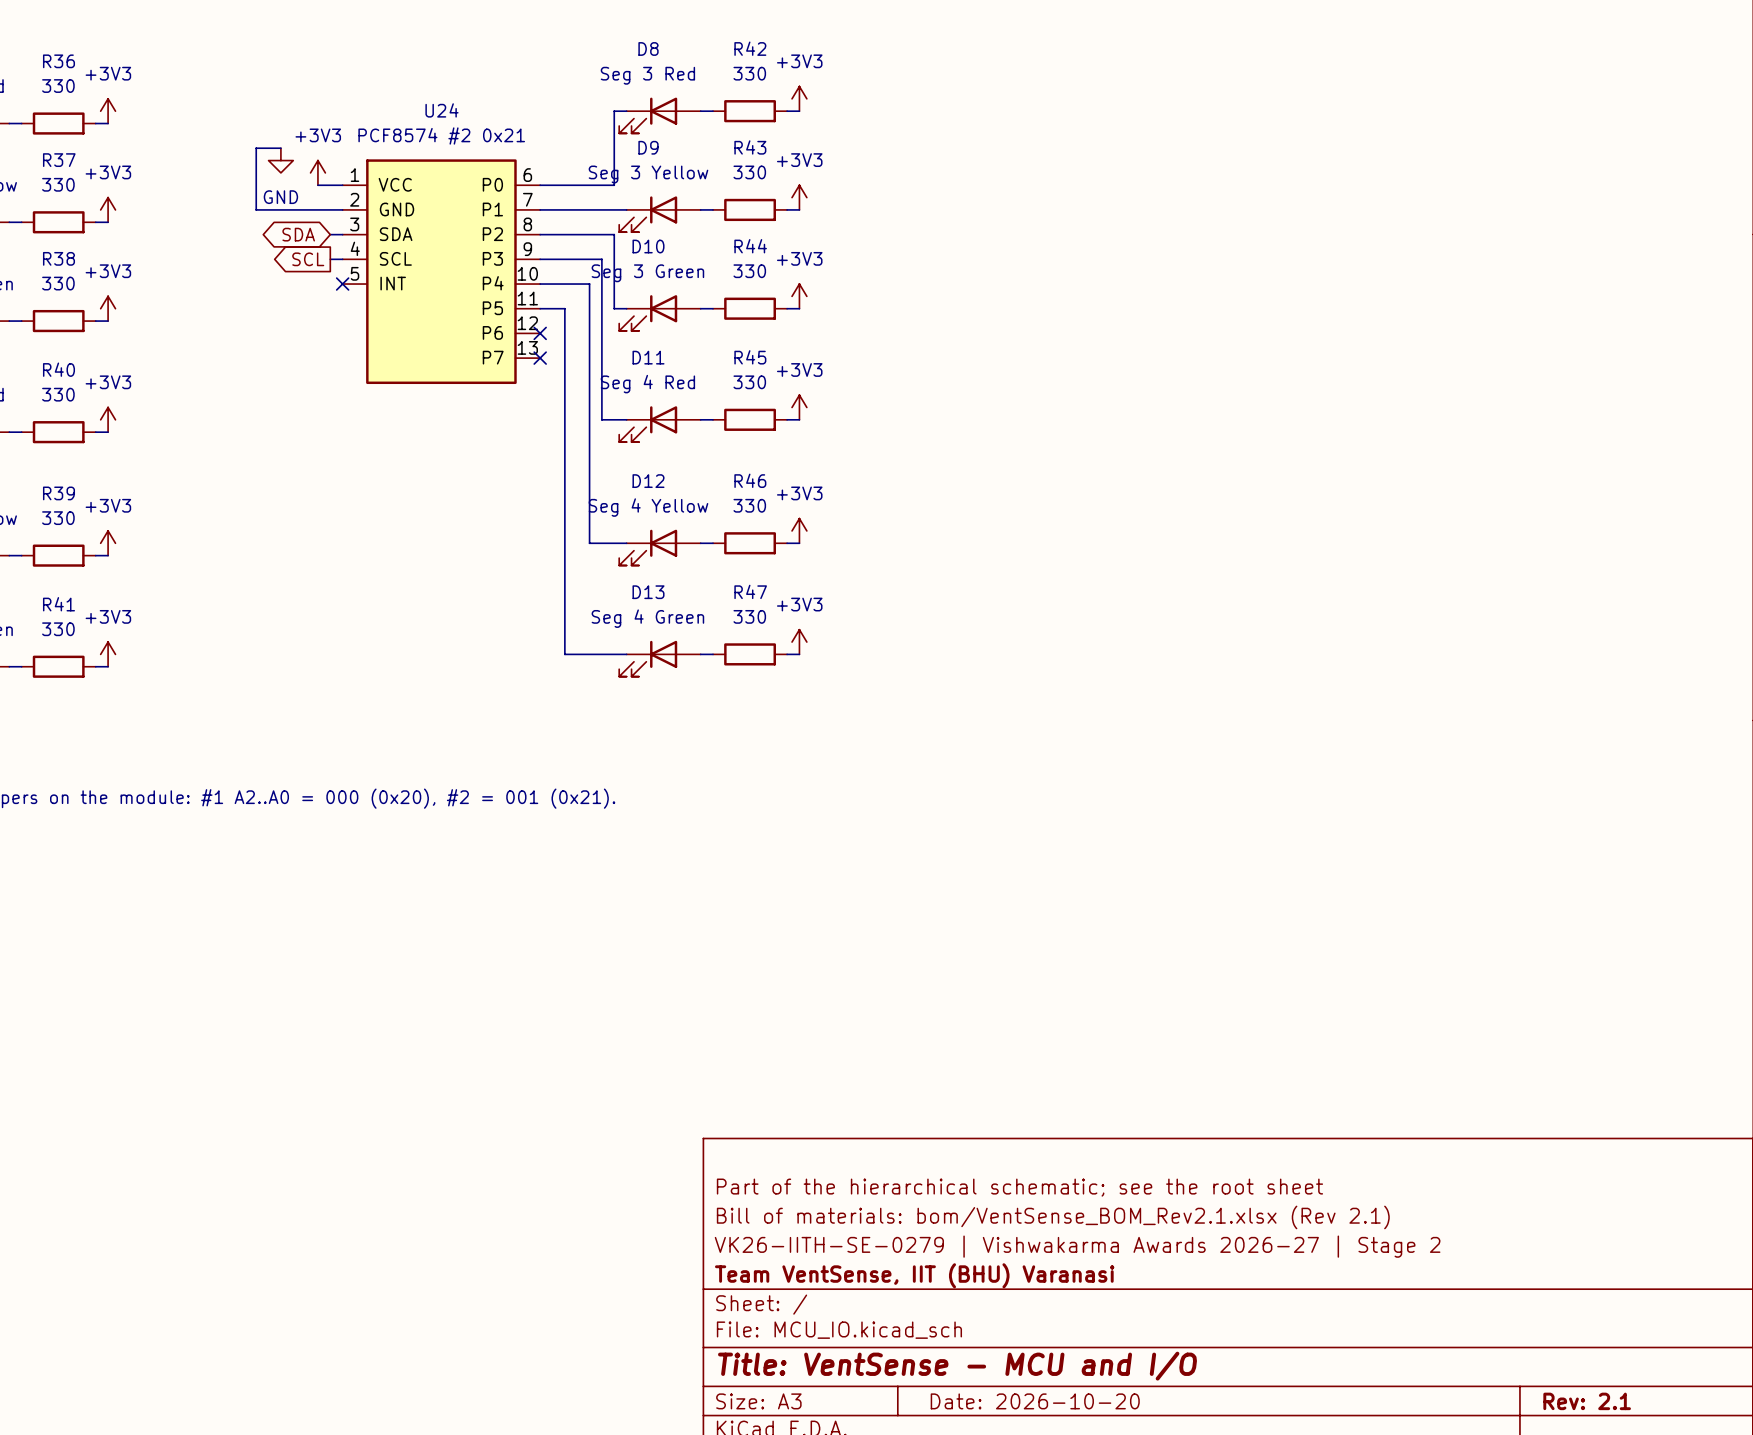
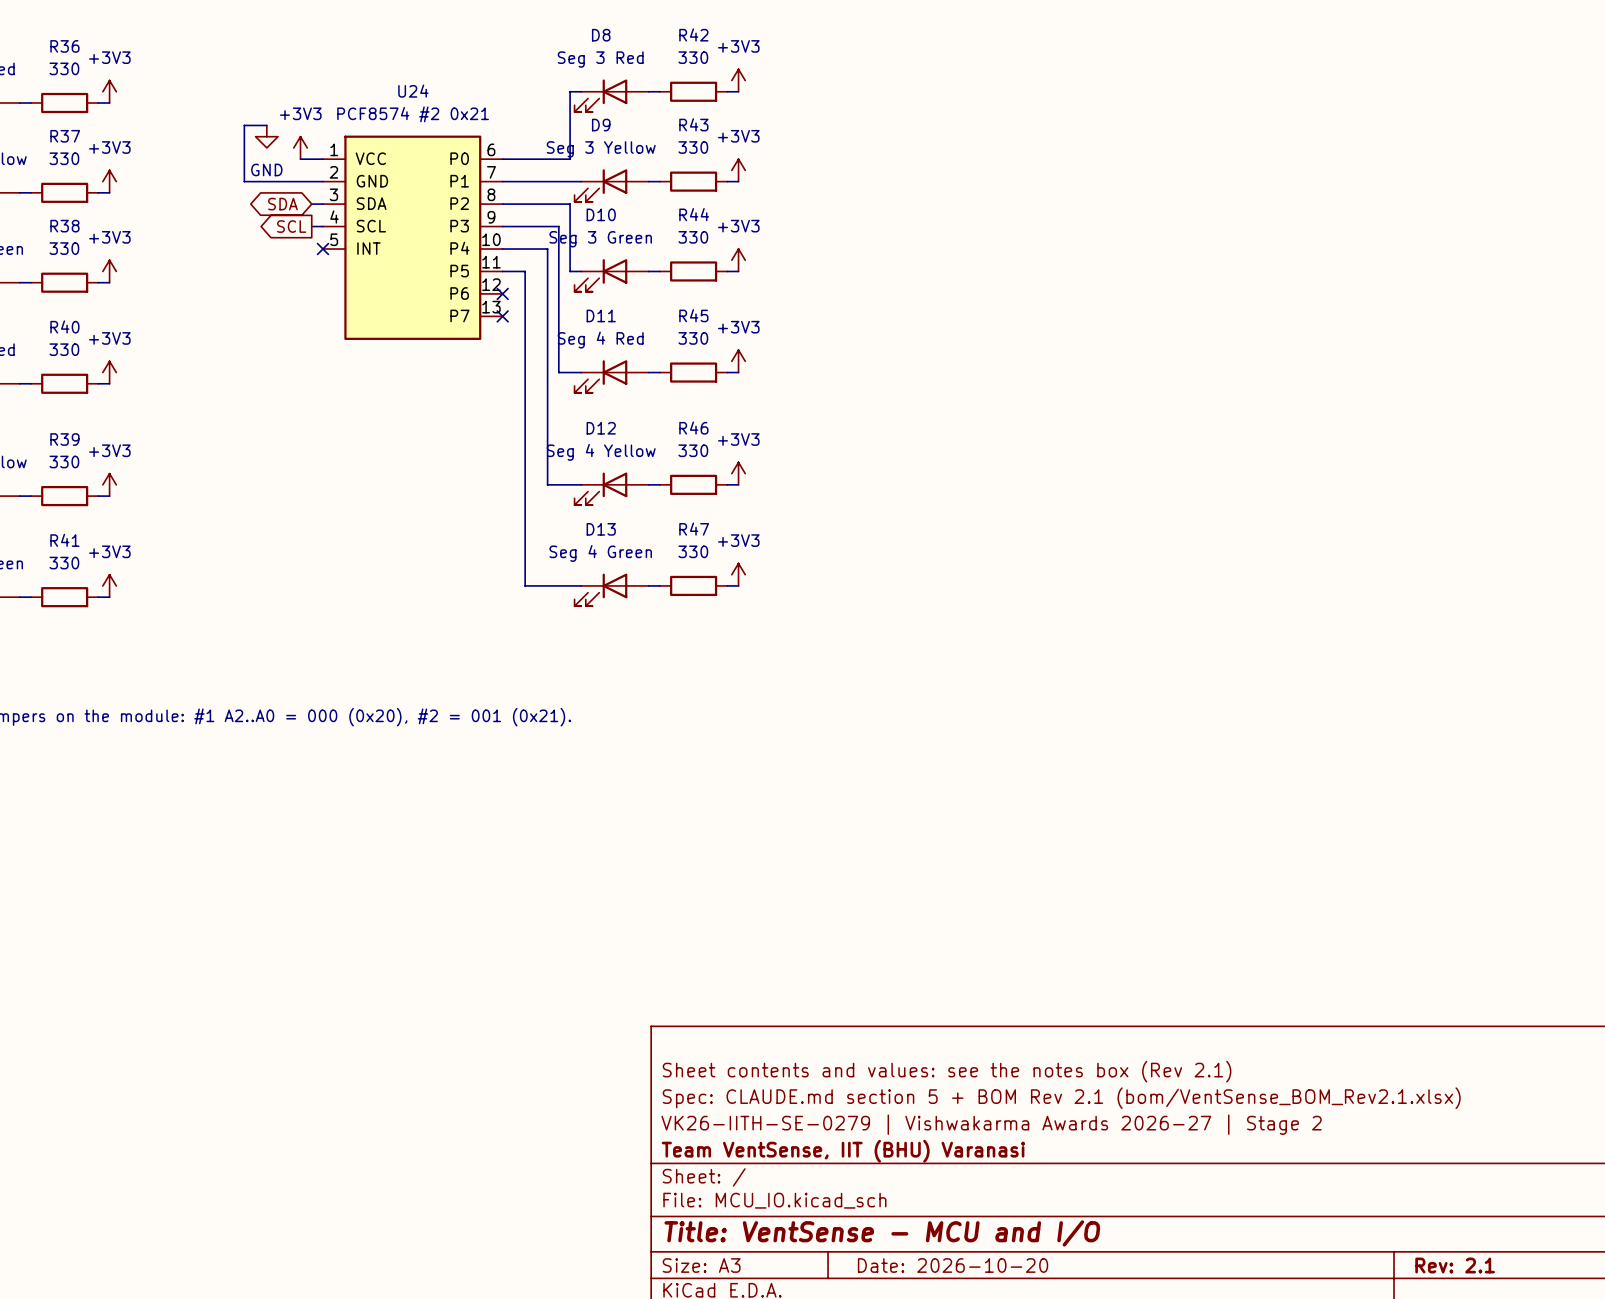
title block: Part of the hierarchical schematic; see the root sheet (1019, 1187) -> Sheet contents and values: see the notes box (Rev 2.1) (947, 1071)
title block: Bill of materials: bom/VentSense_BOM_Rev2.1.xlsx (Rev 2.1) (1053, 1217) -> Spec: CLAUDE.md section 5 + BOM Rev 2.1 (bom/VentSense_BOM_Rev2.1.xlsx) (1061, 1098)

